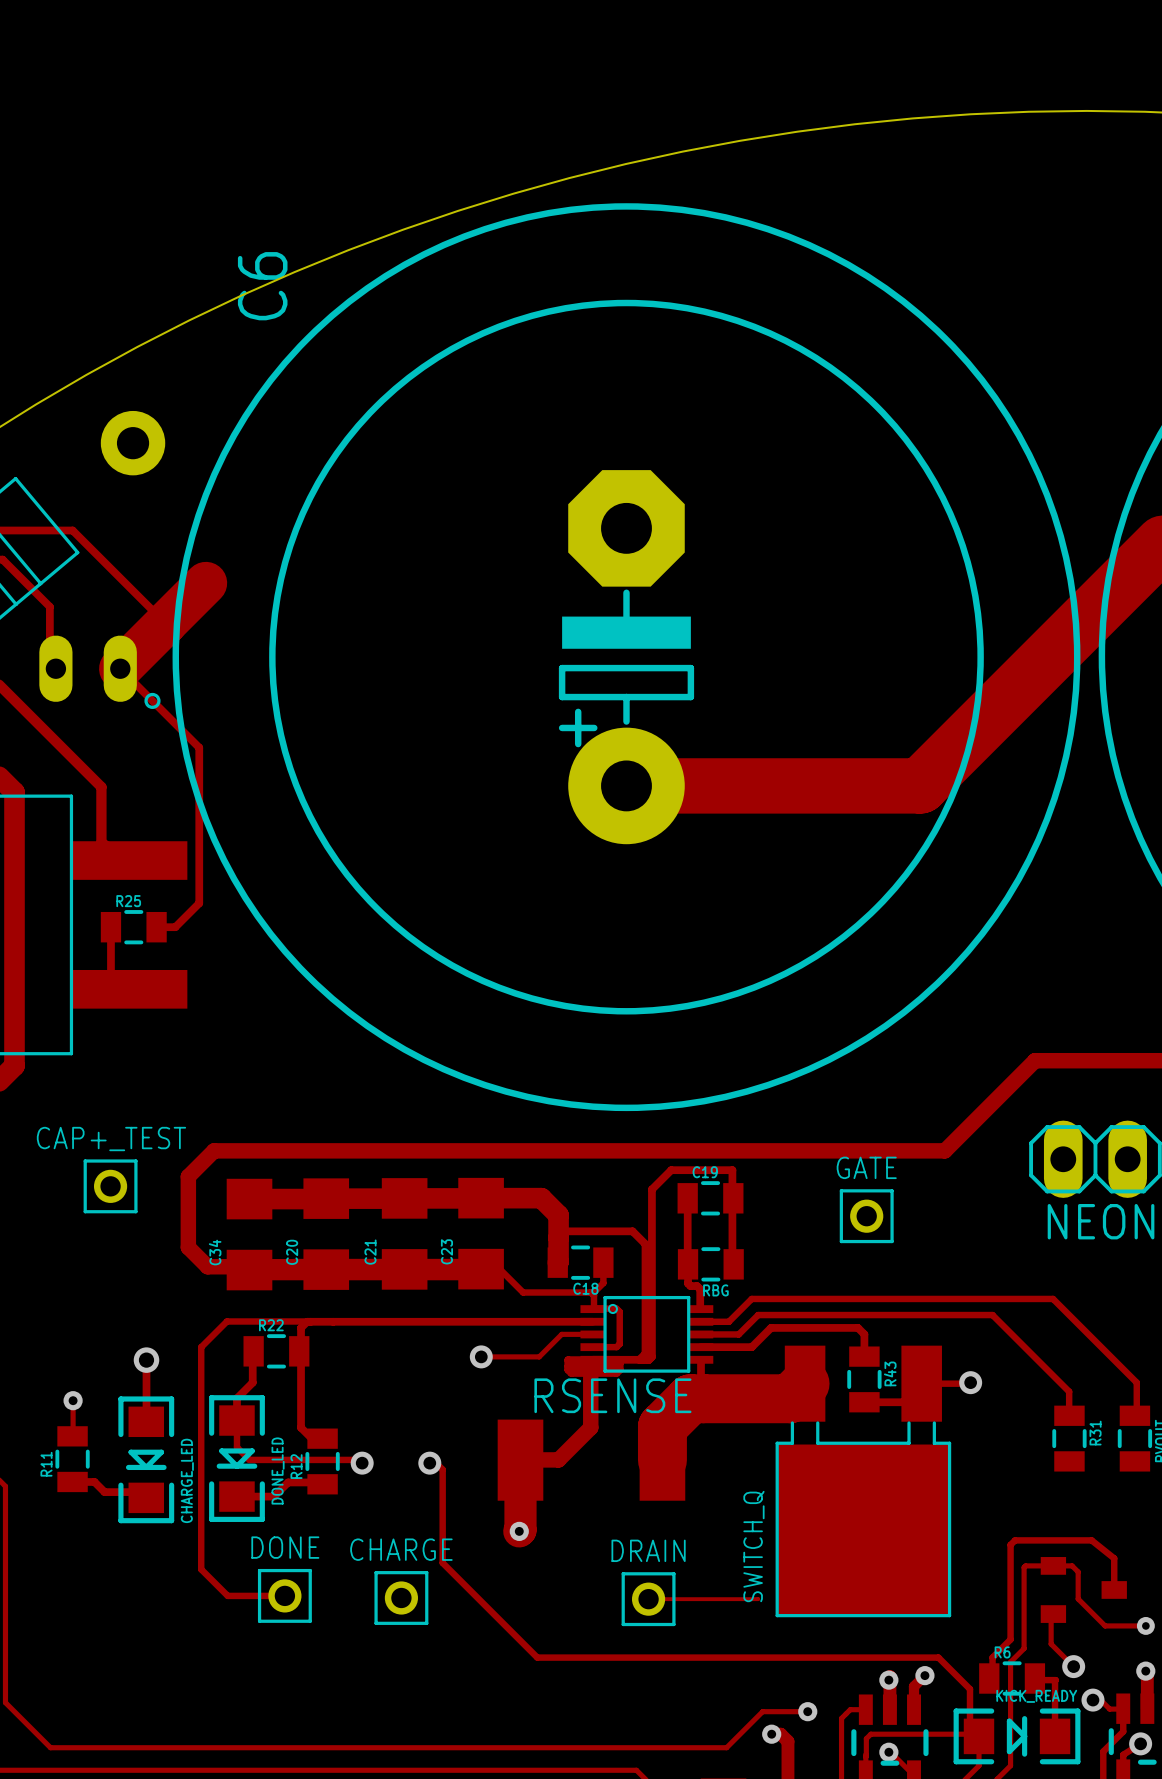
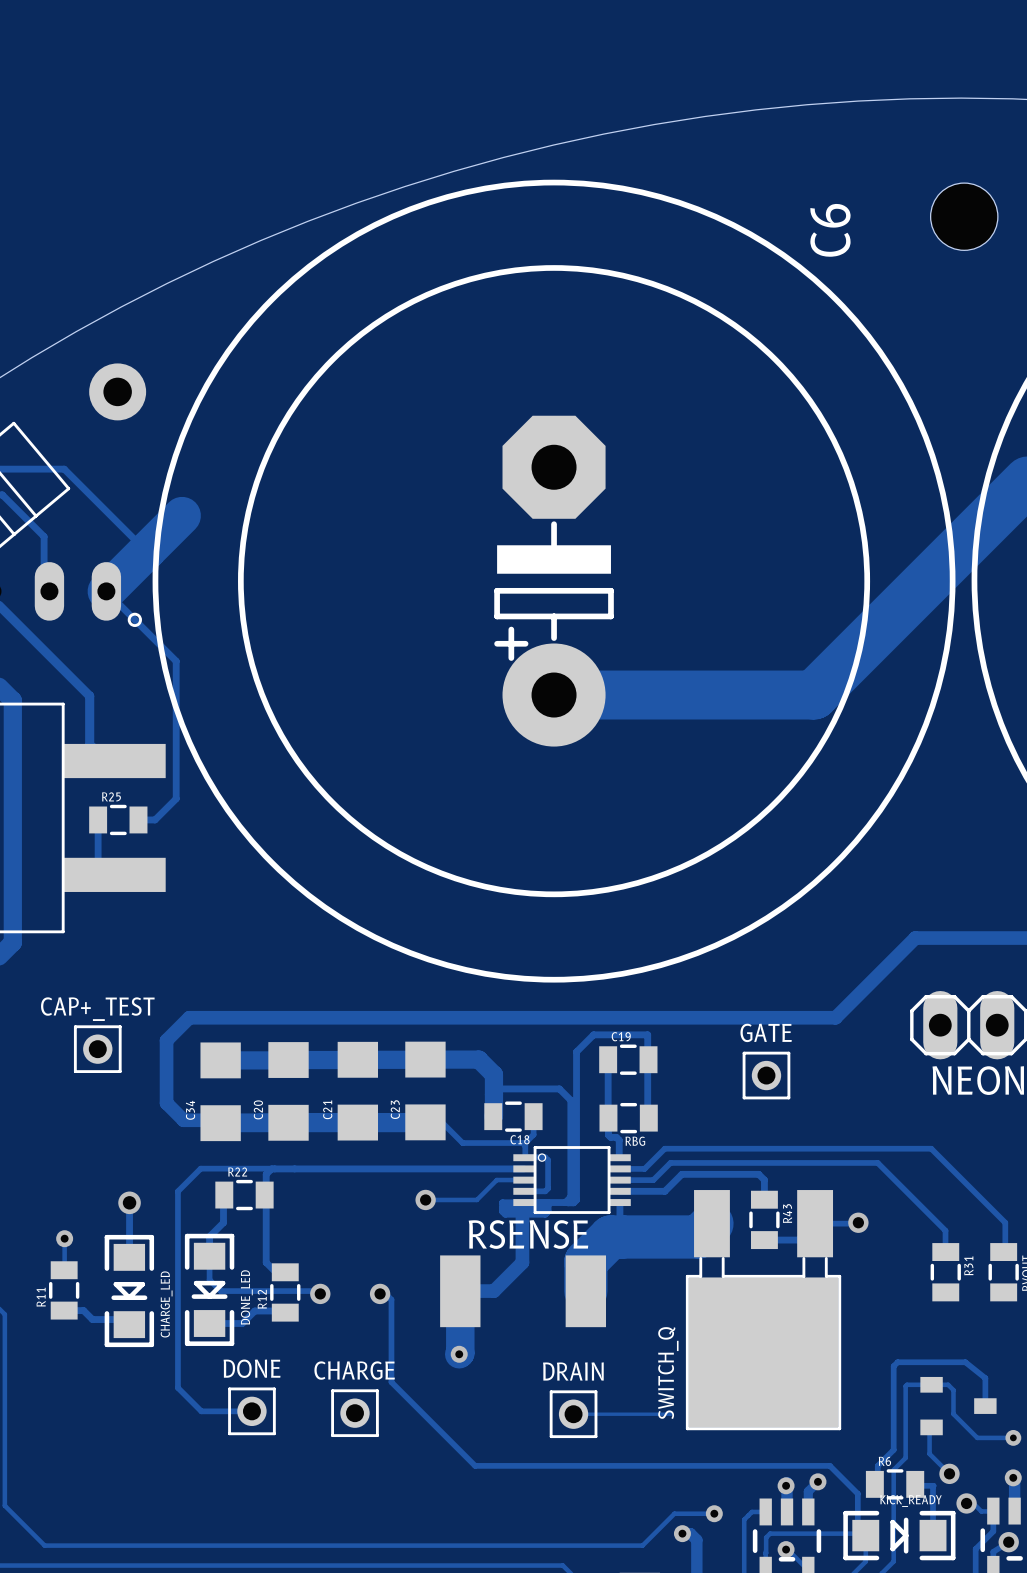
hole: none -> (964, 216)
C6 name position: C6 (262, 286) -> C6 (830, 230)

